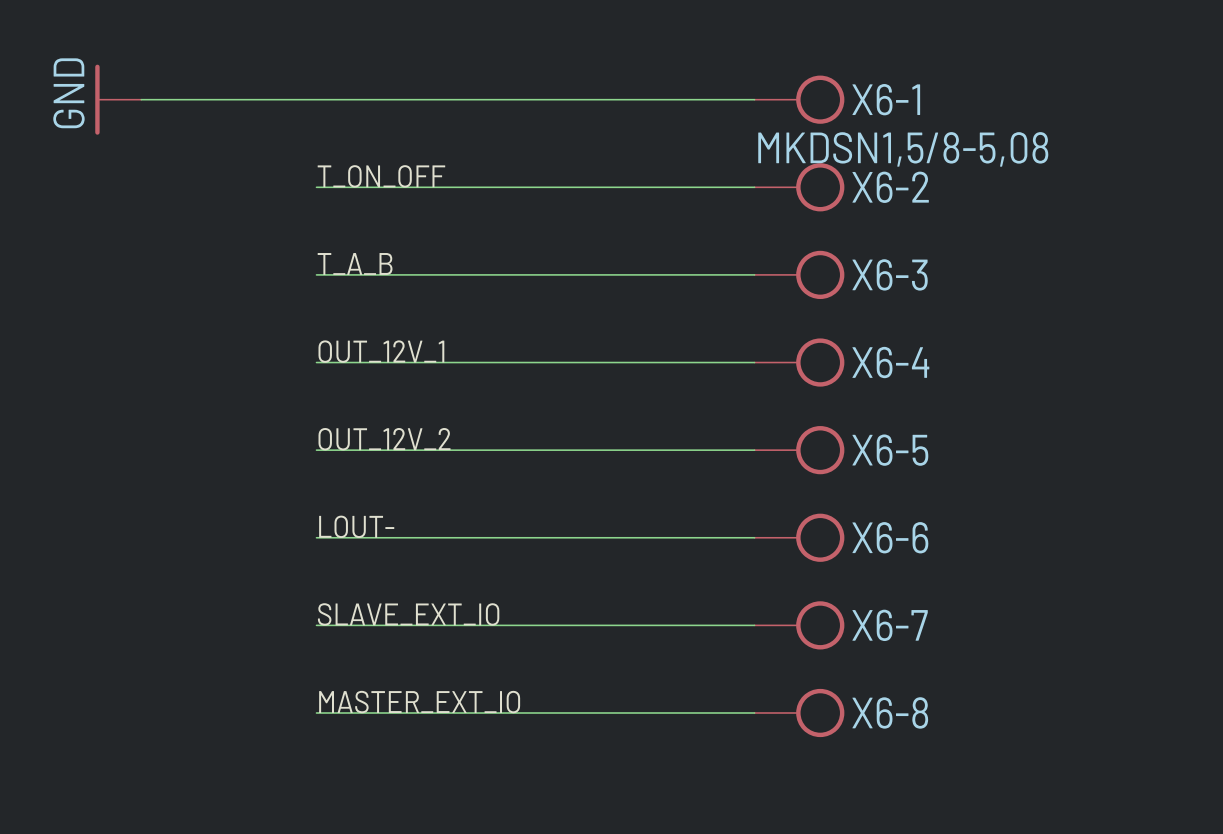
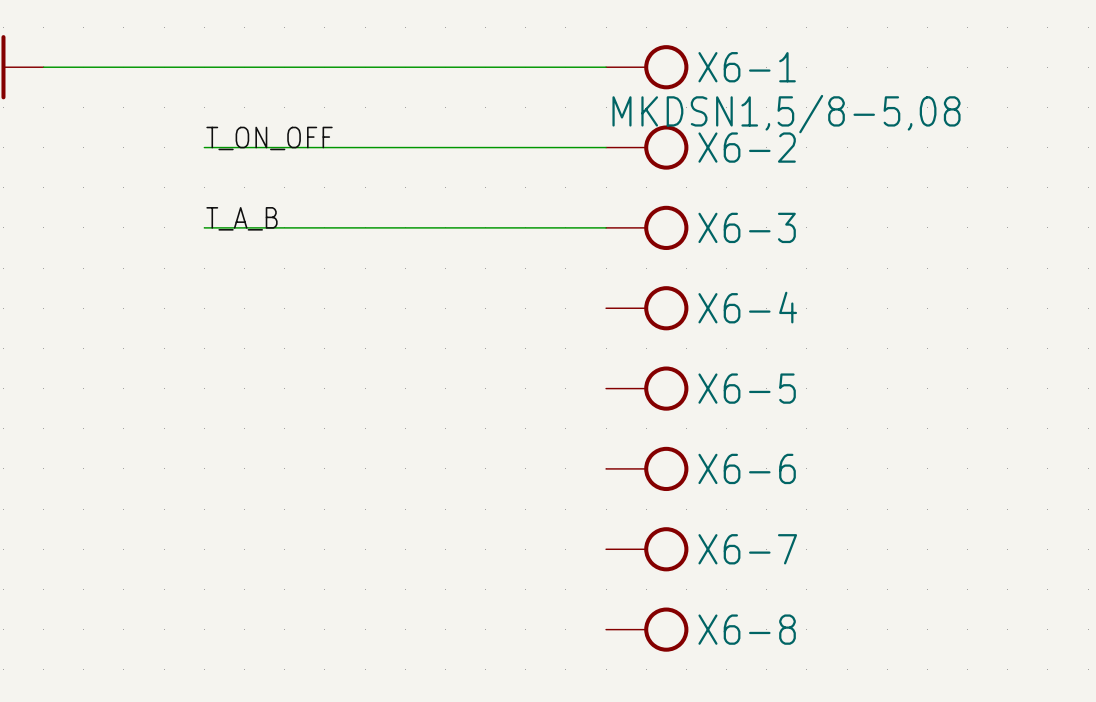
label: OUT_12V_1 (381, 351) -> none
wire: (316, 362) (754, 362) -> none
label: OUT_12V_2 (384, 439) -> none
wire: (316, 450) (754, 450) -> none
label: LOUT- (356, 526) -> none
wire: (316, 537) (754, 537) -> none
label: SLAVE_EXT_IO (408, 614) -> none
wire: (316, 625) (754, 625) -> none
label: MASTER_EXT_IO (419, 702) -> none
wire: (316, 712) (754, 712) -> none

